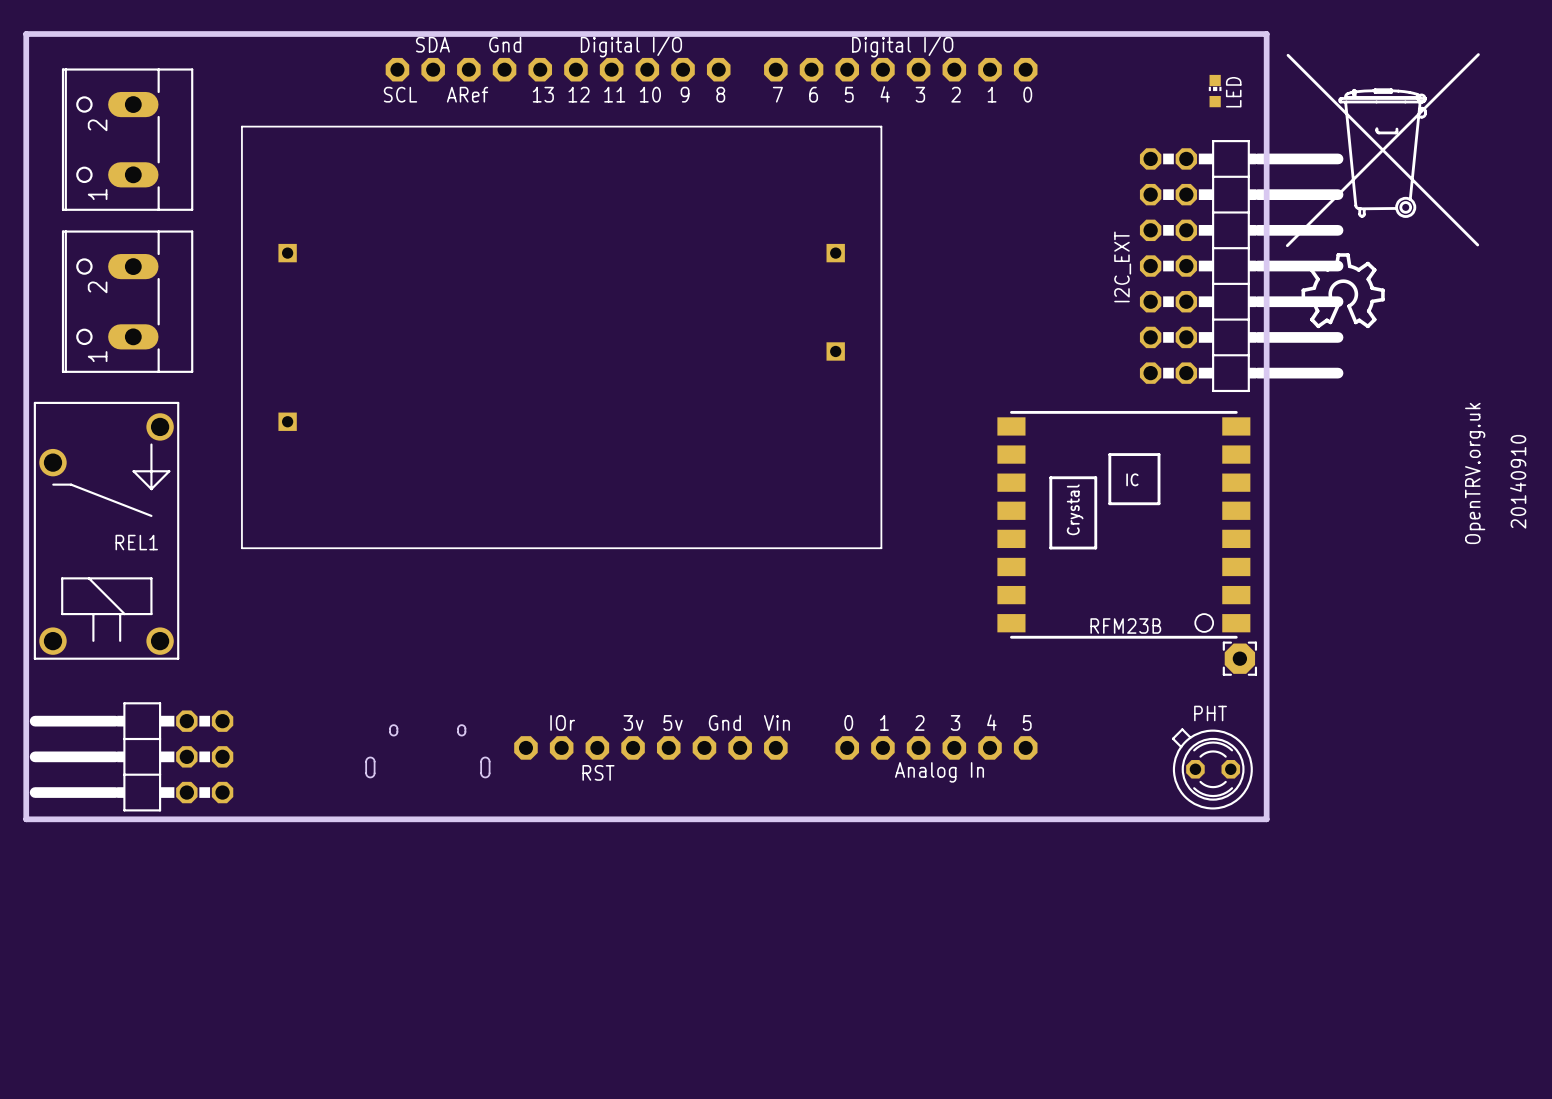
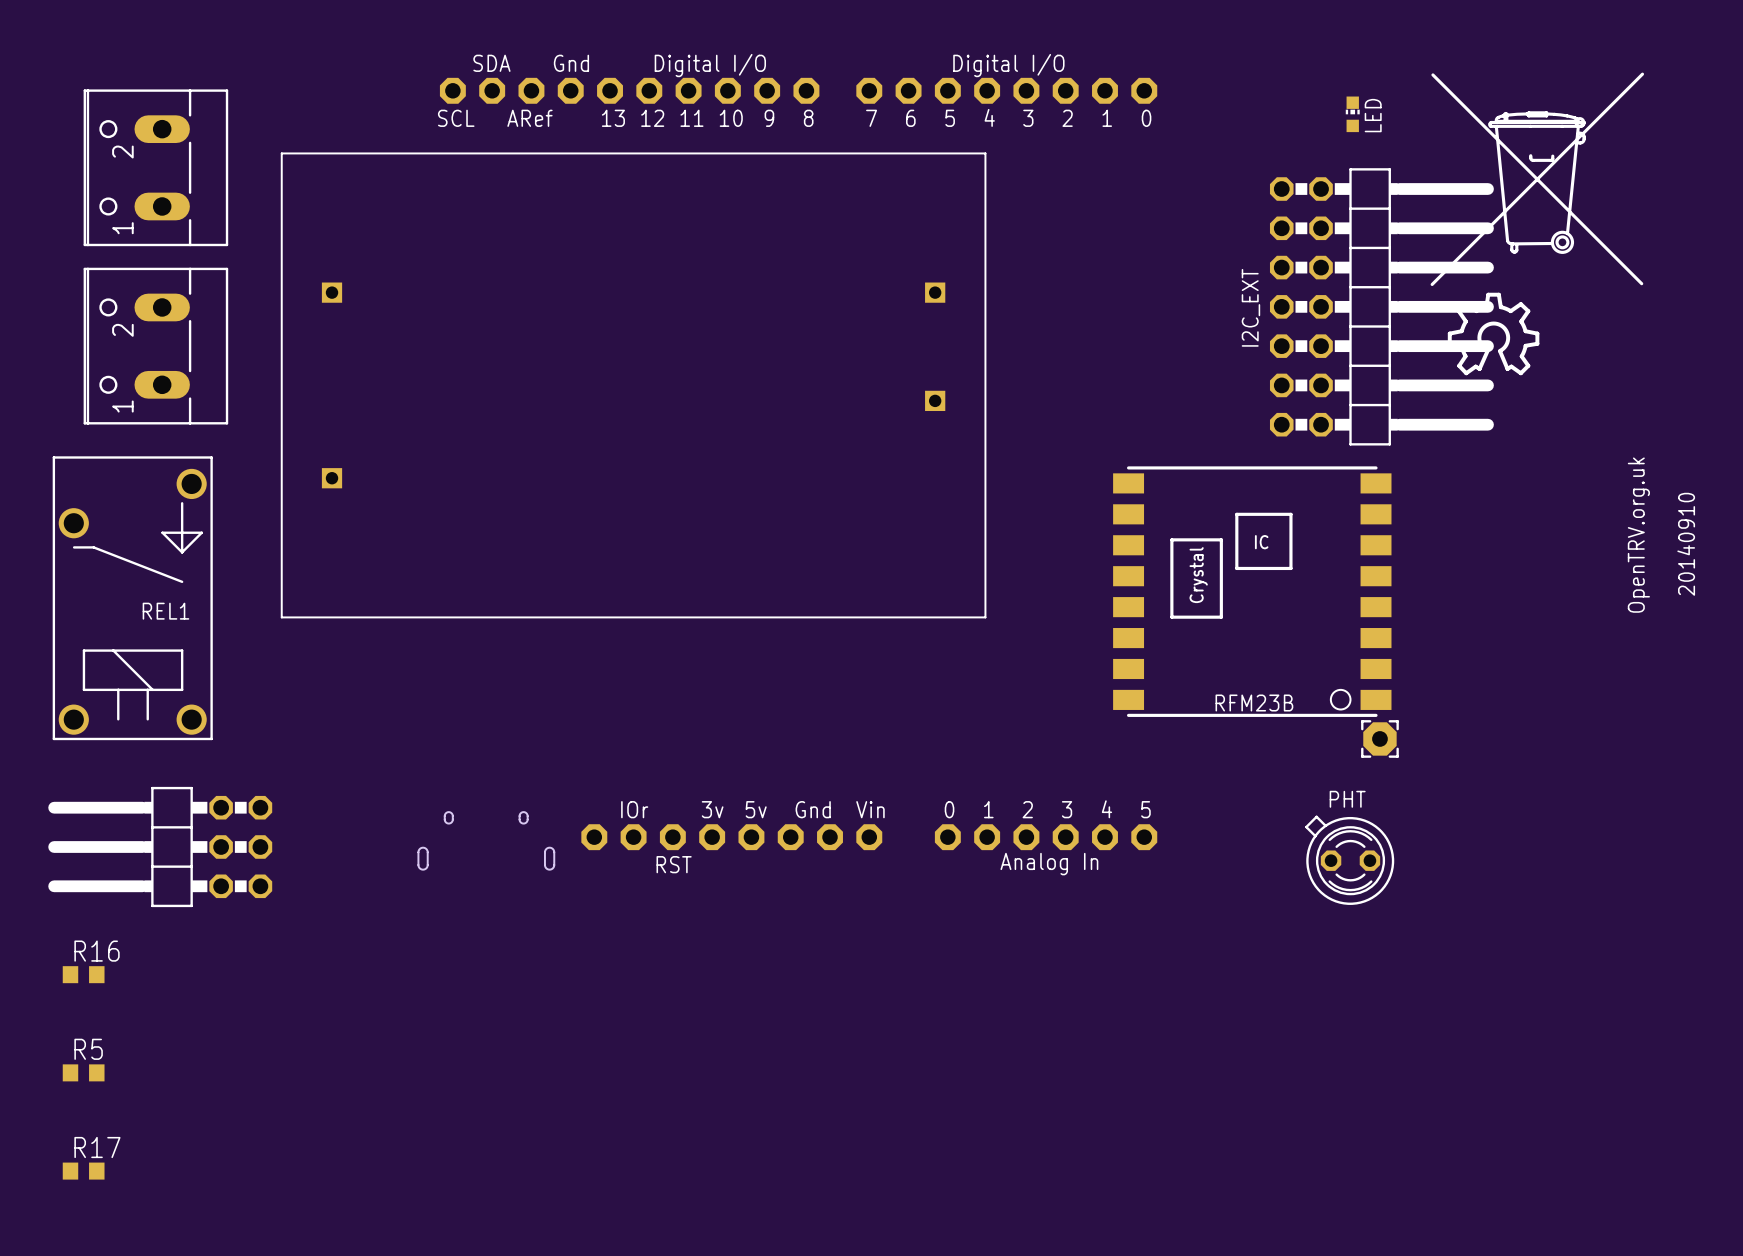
board edge: (26, 34) (26, 819) (1266, 819) (1266, 34) (26, 34) -> none
R16: none -> (83, 974)
R5: none -> (83, 1072)
R17: none -> (83, 1171)

